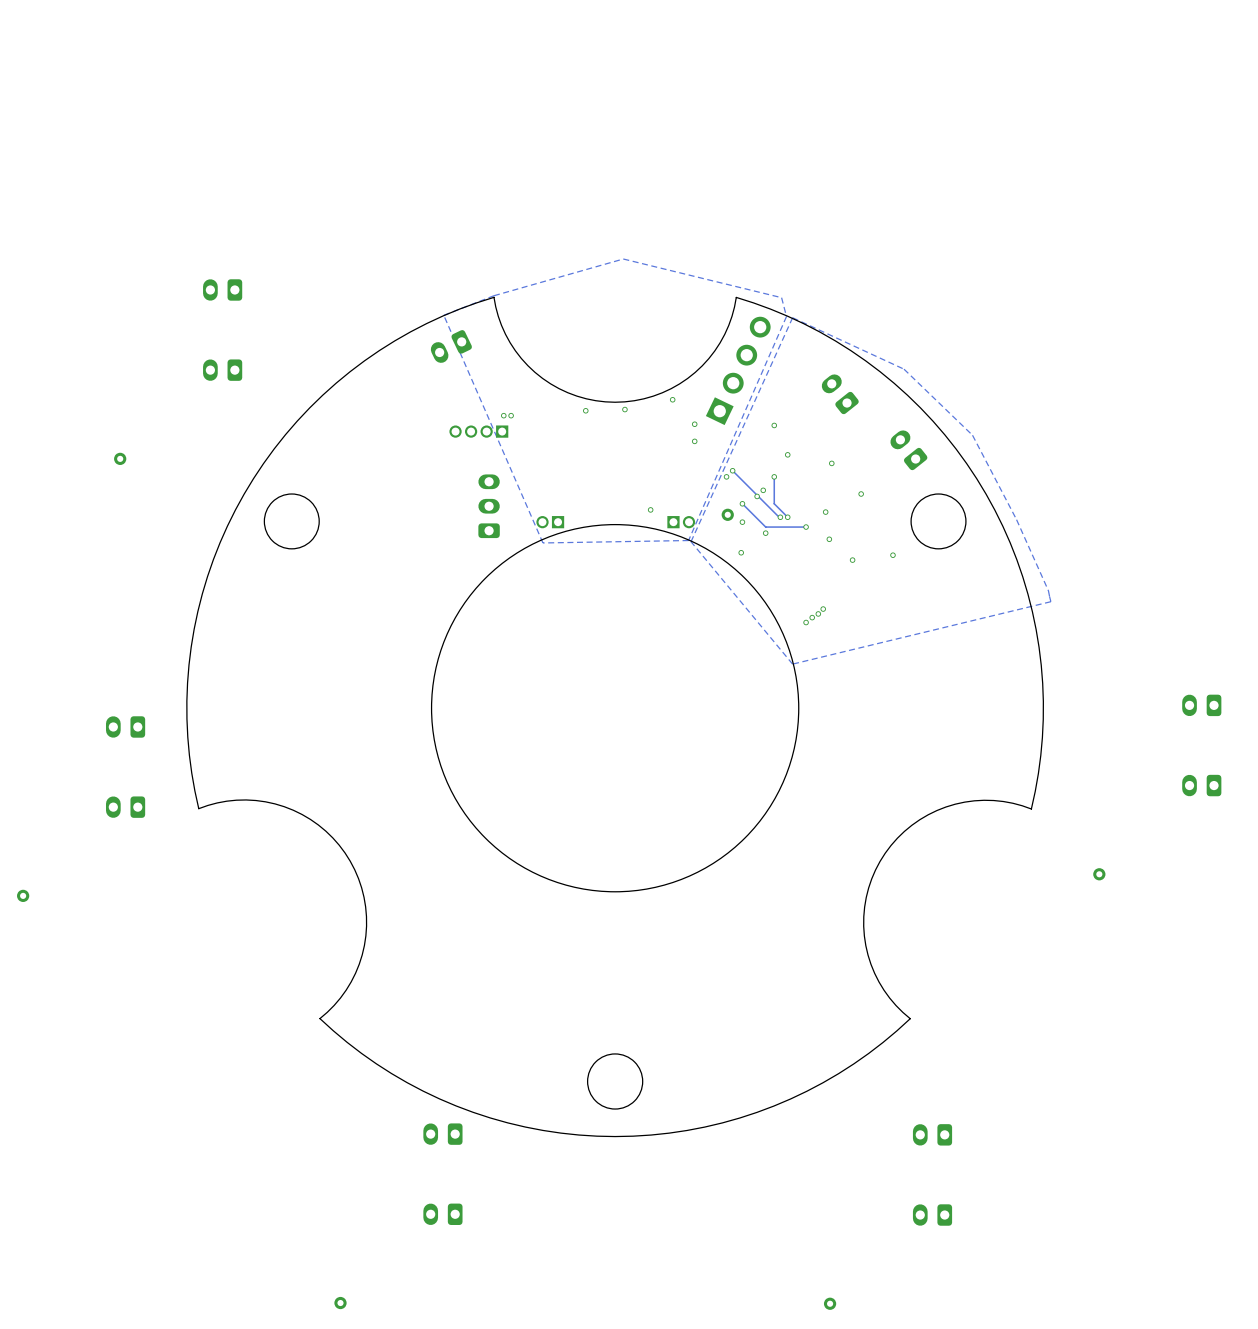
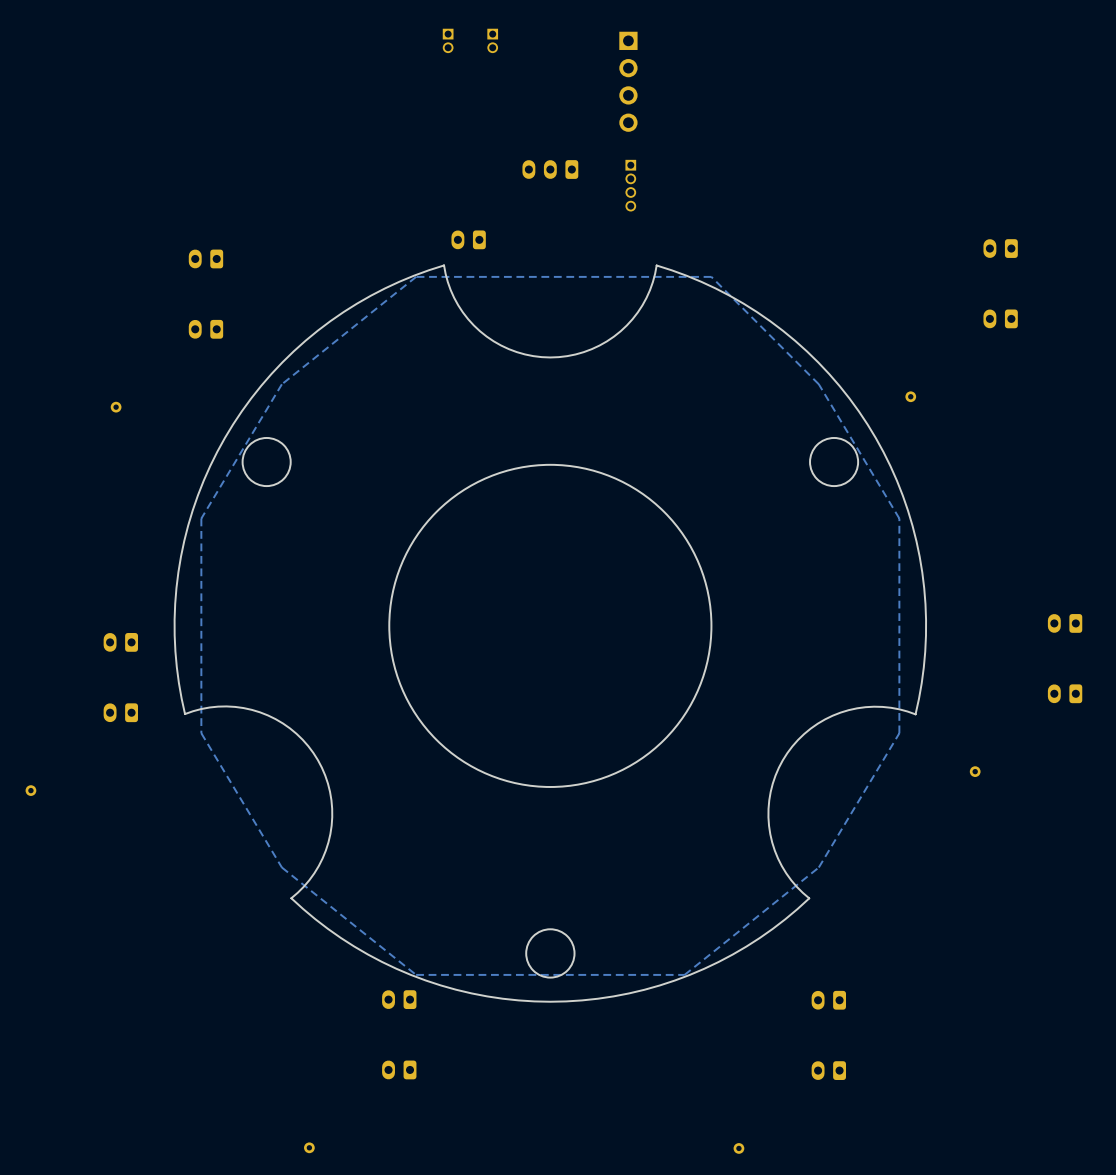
part: none -> (448, 40)
part: none -> (492, 40)
part: none -> (628, 81)
part: none -> (550, 169)
part: none -> (630, 185)
zone outline: (623, 259) (493, 295) (443, 315) (542, 542) (688, 540) (786, 316) (781, 297) (623, 259) -> none
part: none -> (468, 239)
part: none -> (1000, 248)
zone outline: none -> (711, 276) (818, 384) (899, 518) (899, 733) (818, 867) (684, 974) (416, 974) (281, 867) (201, 733) (201, 518) (281, 384) (416, 276) (711, 276)
zone outline: (792, 317) (691, 541) (792, 664) (1050, 601) (1048, 590) (1016, 519) (972, 435) (903, 369) (792, 317) -> none
part: (451, 346) -> none
part: none -> (1000, 318)
part: (738, 370) -> none
part: (840, 394) -> none
via: (672, 399) -> none
via: (624, 409) -> none
via: (585, 410) -> none
via: (503, 415) -> none
via: (511, 415) -> none
via: (694, 424) -> none
via: (774, 425) -> none
part: (478, 431) -> none
via: (694, 441) -> none
part: (908, 450) -> none
via: (787, 454) -> none
via: (831, 463) -> none
track: (732, 470) (780, 517) -> none
via: (732, 470) -> none
via: (726, 476) -> none
track: (774, 476) (774, 503) (787, 517) -> none
via: (774, 476) -> none
via: (763, 490) -> none
via: (861, 494) -> none
via: (757, 496) -> none
track: (742, 503) (765, 527) (806, 527) -> none
via: (742, 503) -> none
part: (489, 506) -> none
via: (650, 509) -> none
via: (825, 512) -> none
part position: (727, 514) -> (910, 396)
via: (780, 517) -> none
via: (787, 517) -> none
part: (550, 522) -> none
part: (681, 522) -> none
via: (742, 522) -> none
via: (806, 527) -> none
via: (765, 533) -> none
via: (829, 539) -> none
via: (741, 552) -> none
via: (892, 555) -> none
via: (852, 560) -> none
via: (823, 609) -> none
via: (818, 613) -> none
via: (812, 617) -> none
via: (806, 622) -> none

